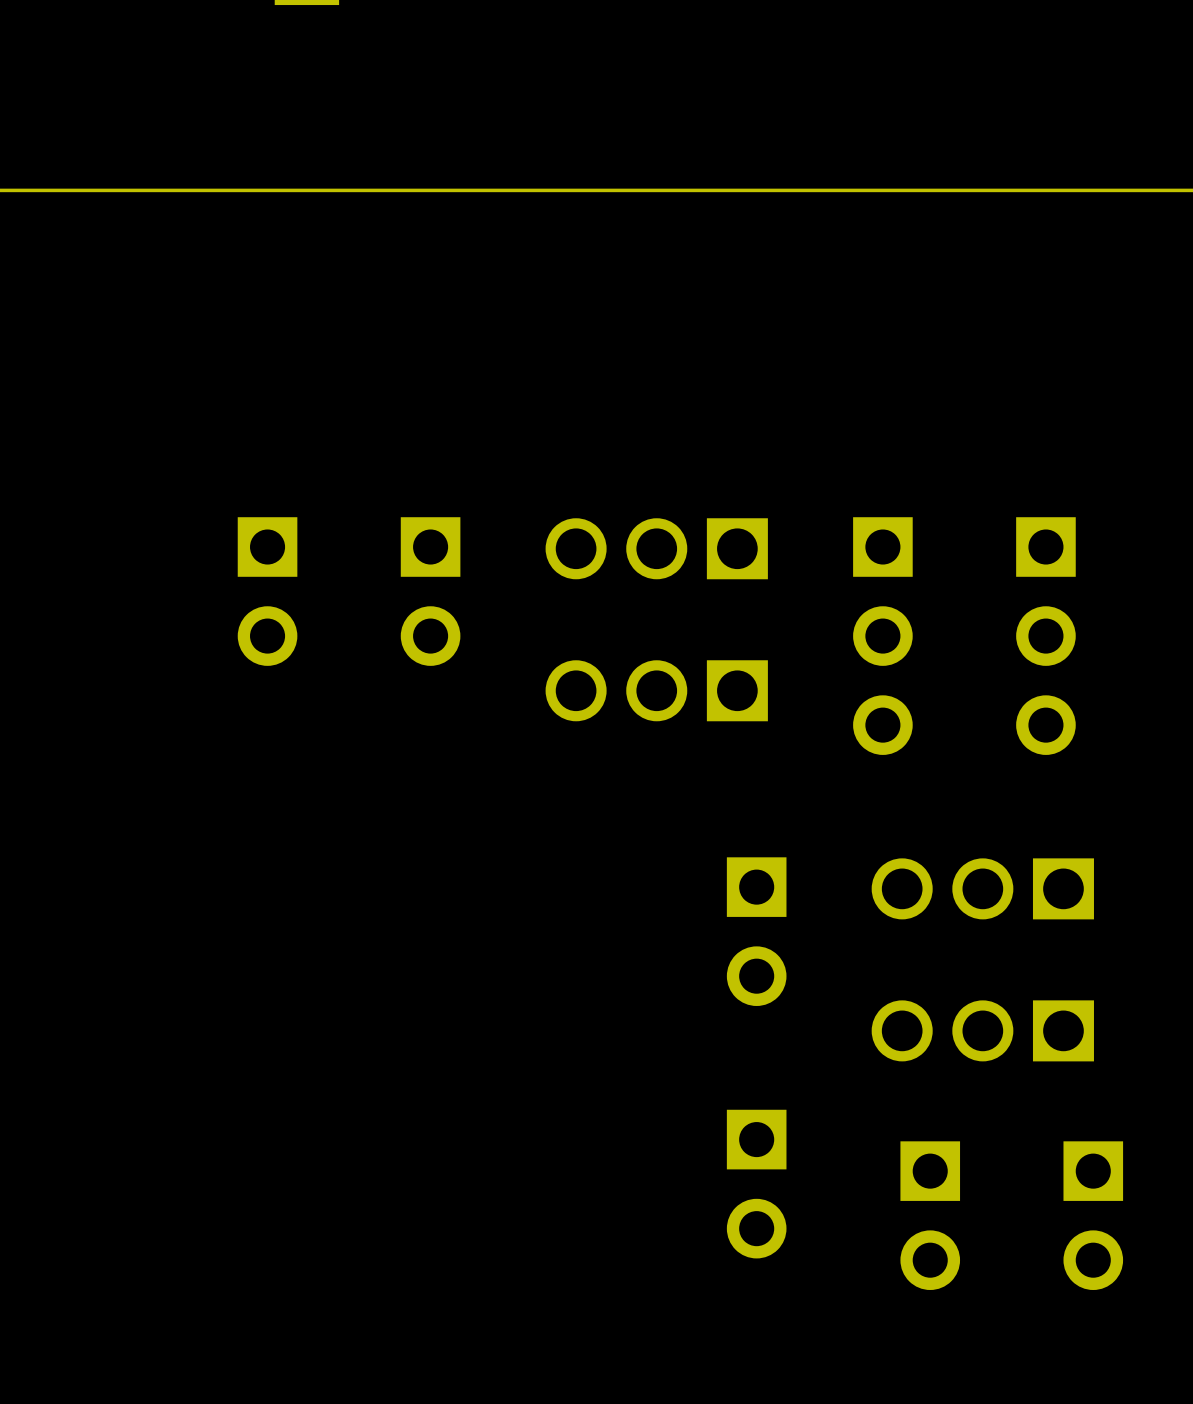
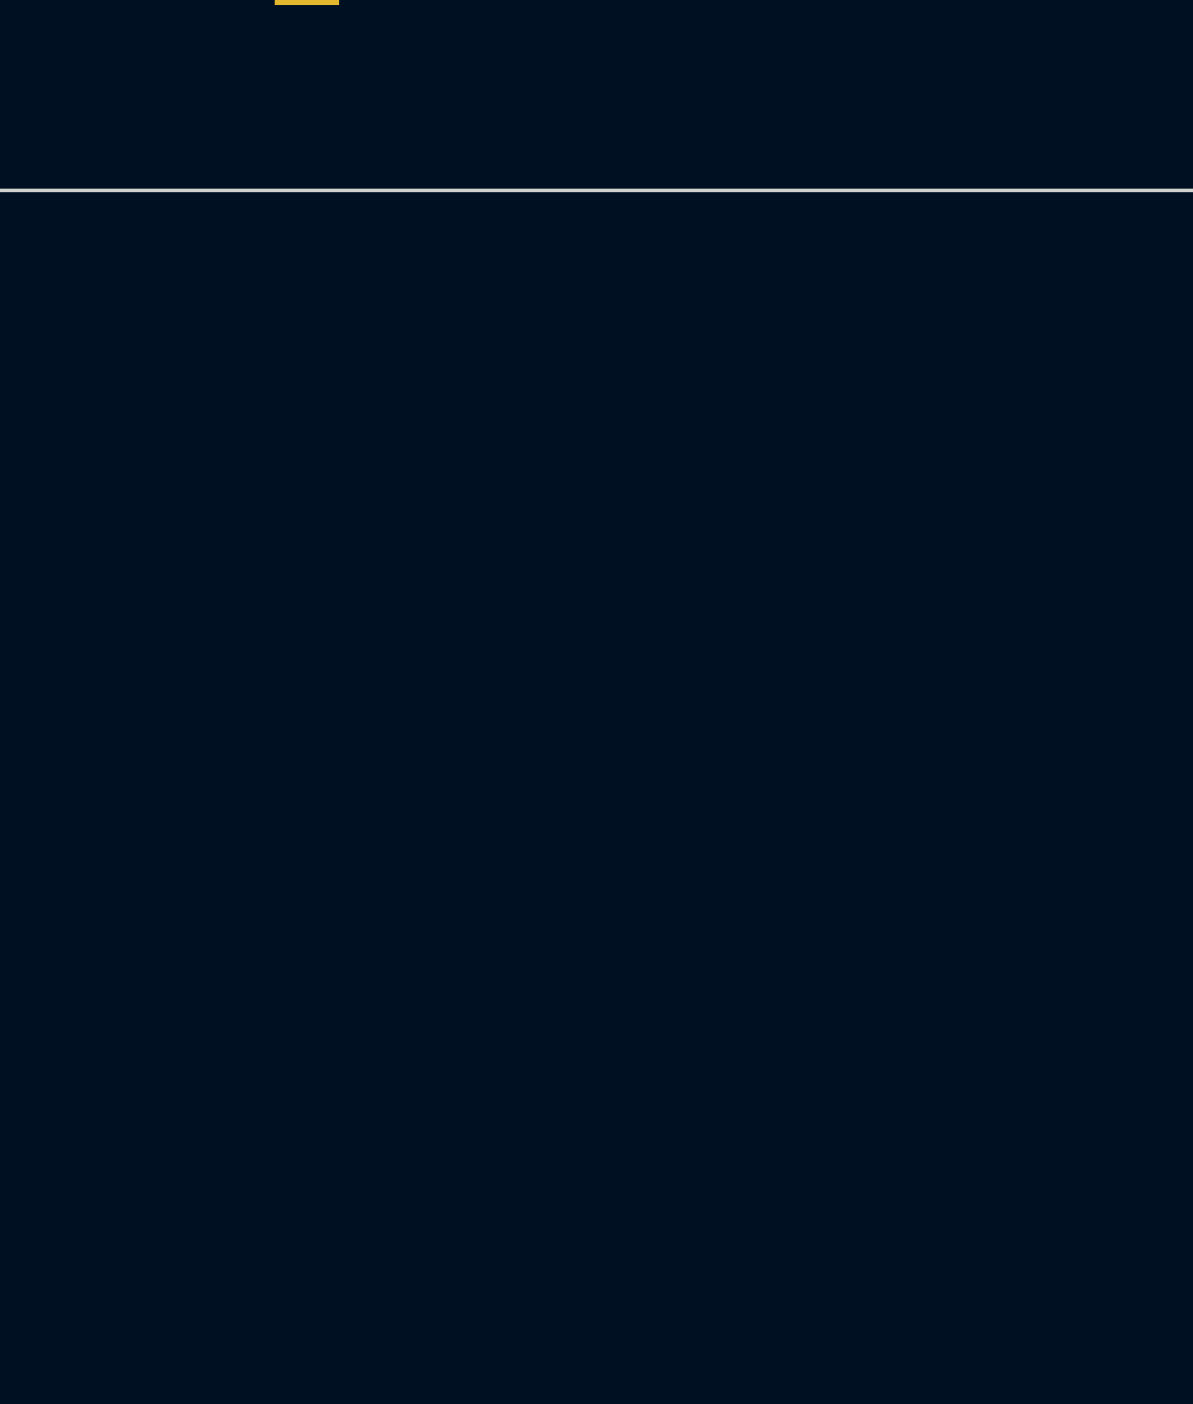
part: (656, 548) -> none
part: (267, 591) -> none
part: (430, 591) -> none
part: (882, 636) -> none
part: (1045, 636) -> none
part: (656, 690) -> none
part: (982, 888) -> none
part: (756, 931) -> none
part: (982, 1030) -> none
part: (756, 1184) -> none
part: (930, 1215) -> none
part: (1093, 1215) -> none

